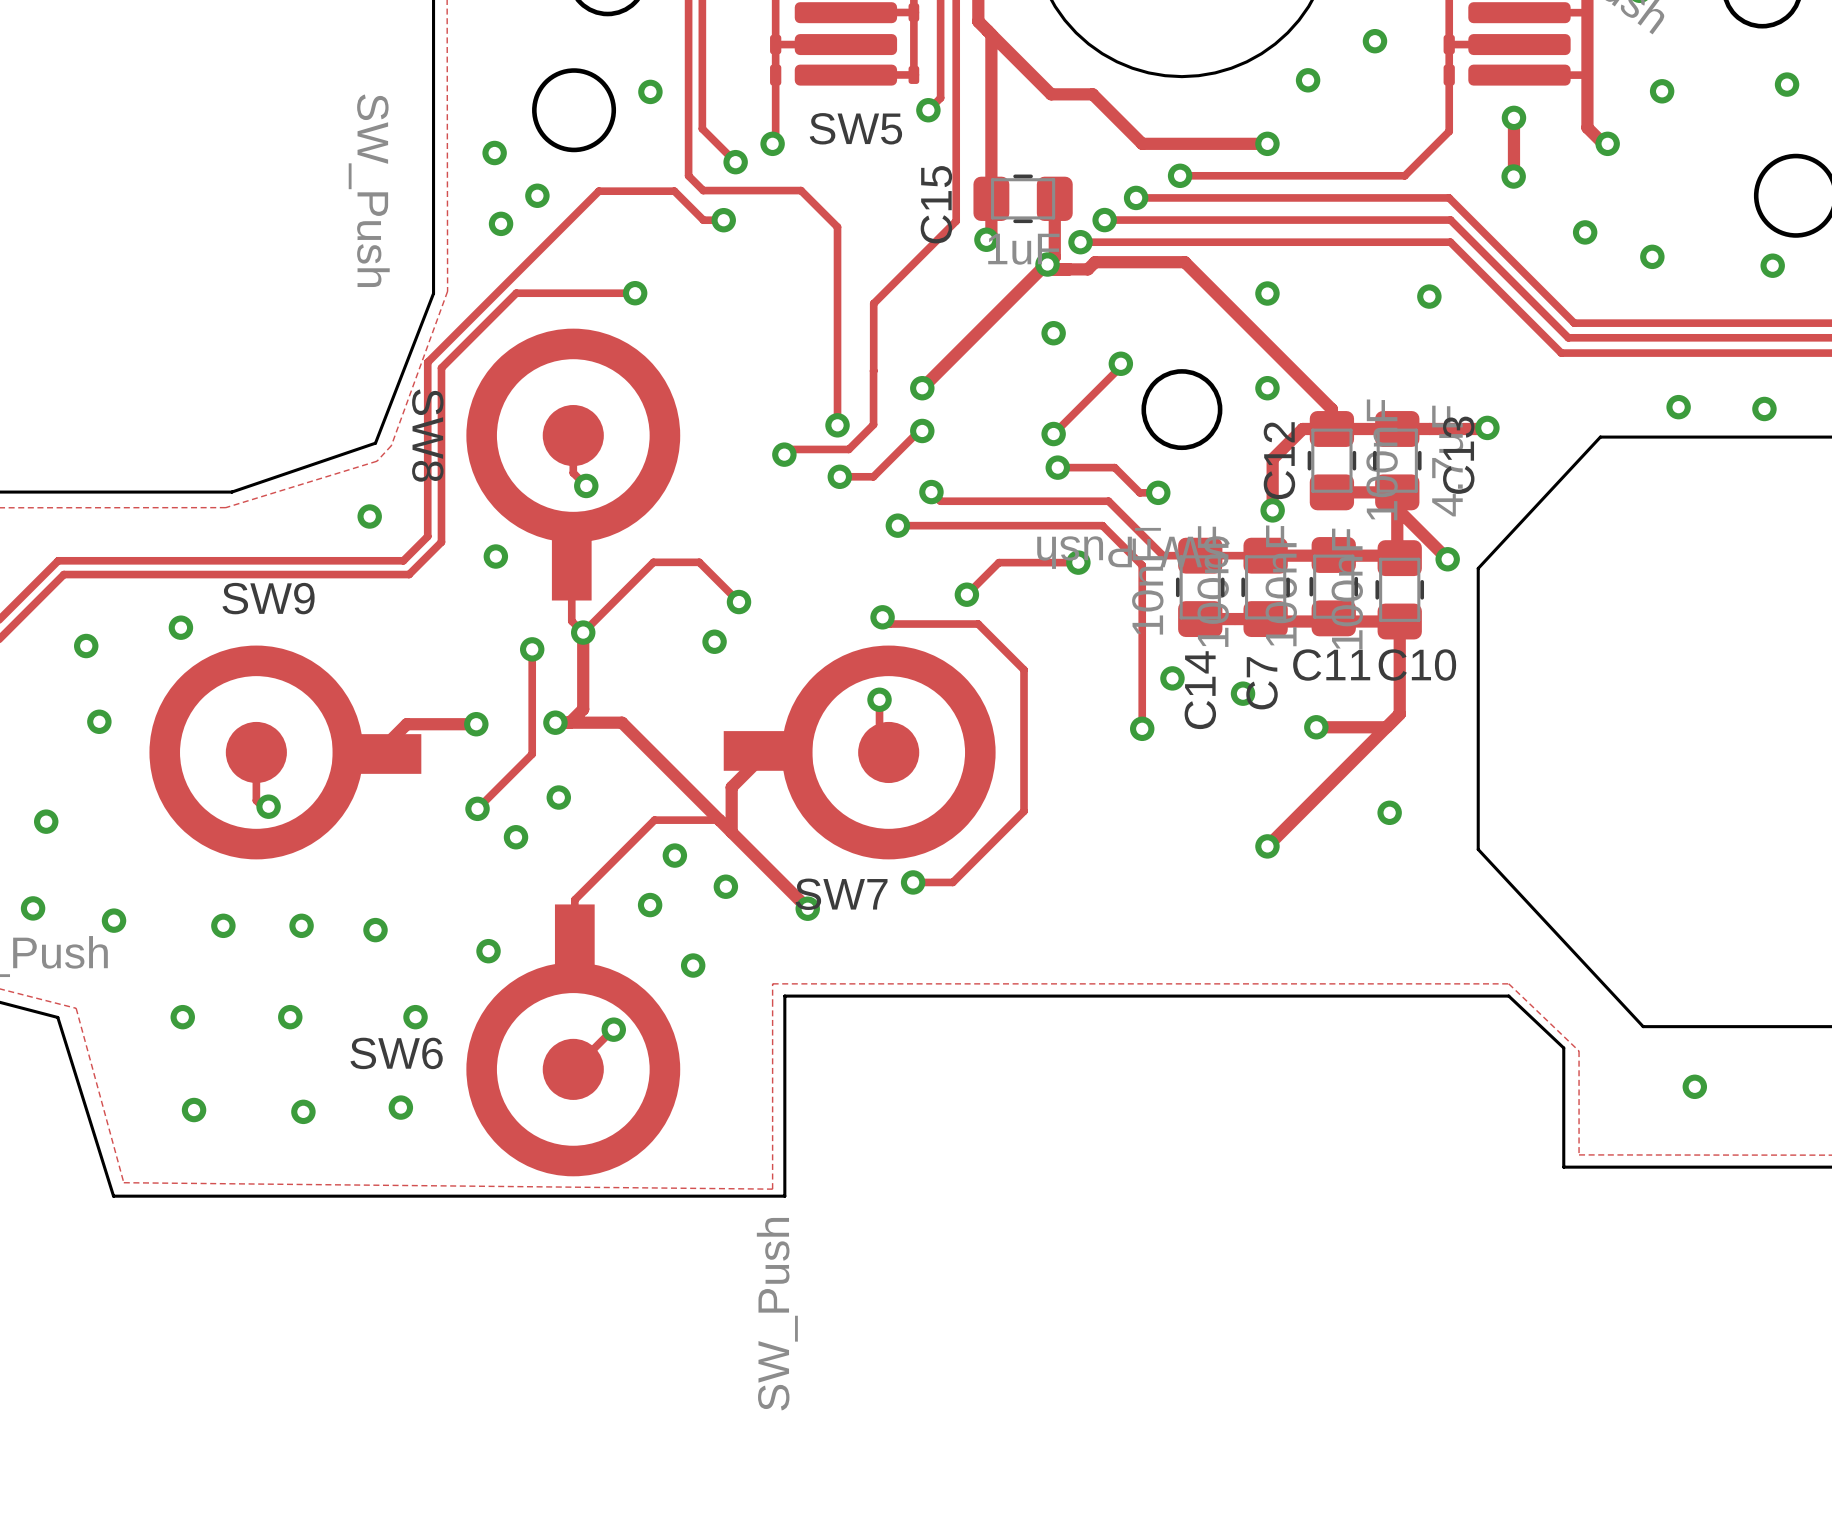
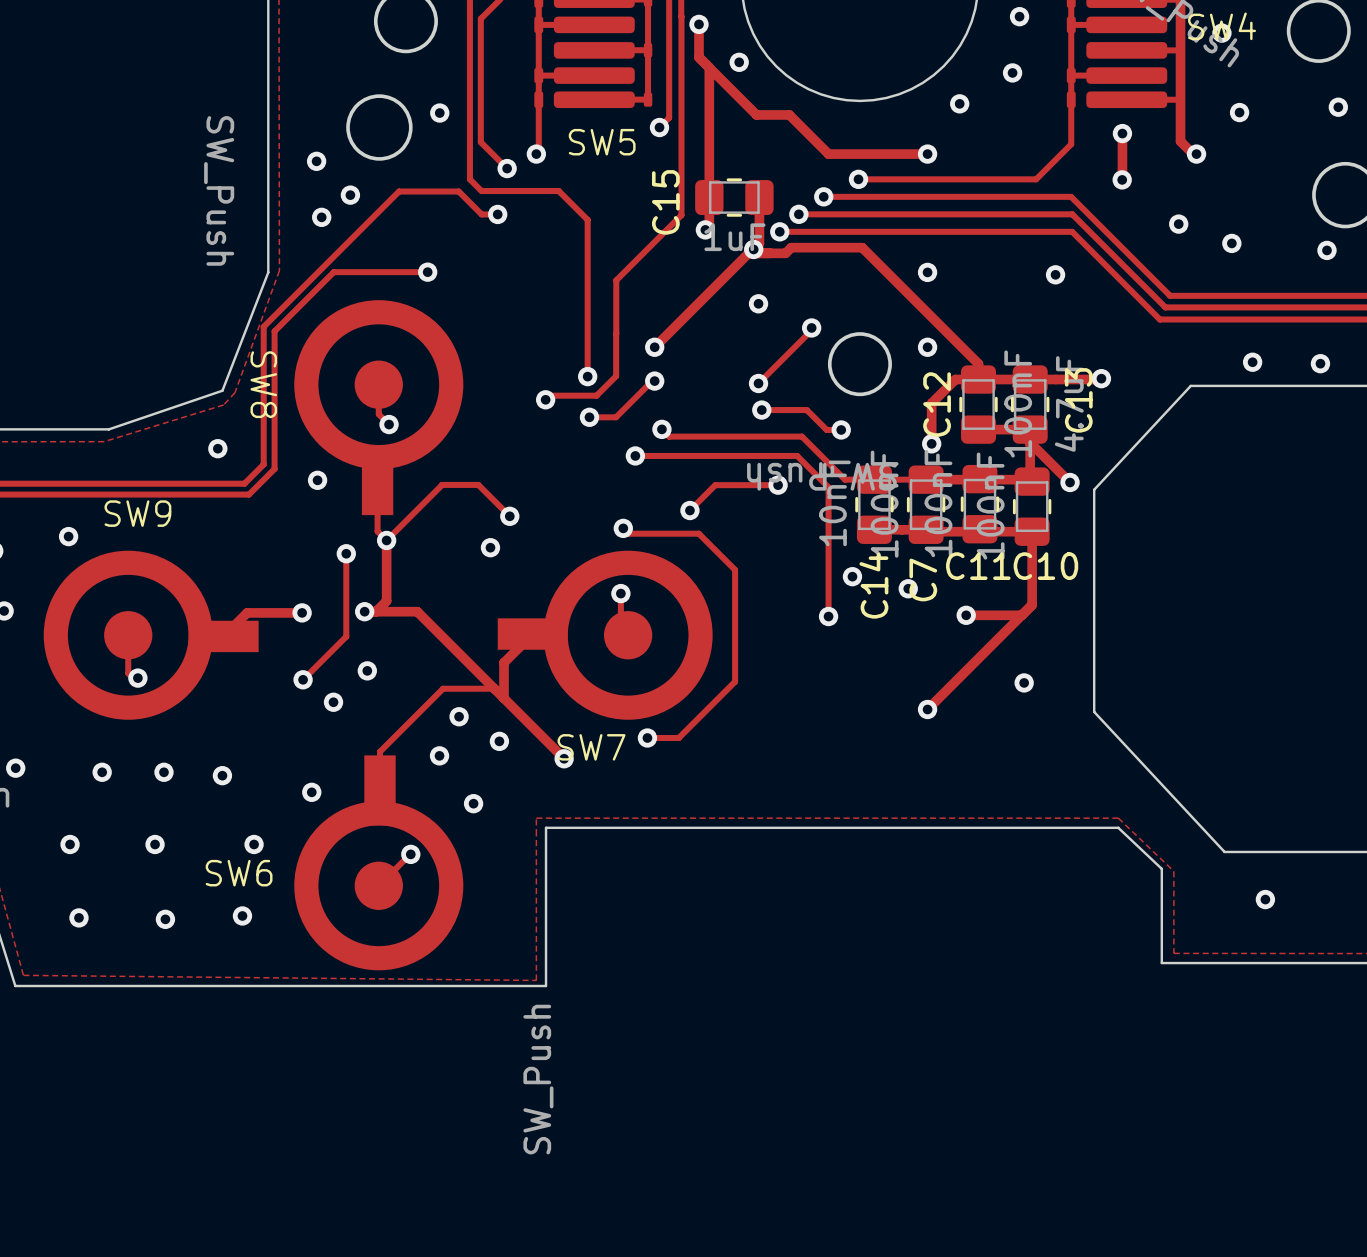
via: none -> (739, 62)

